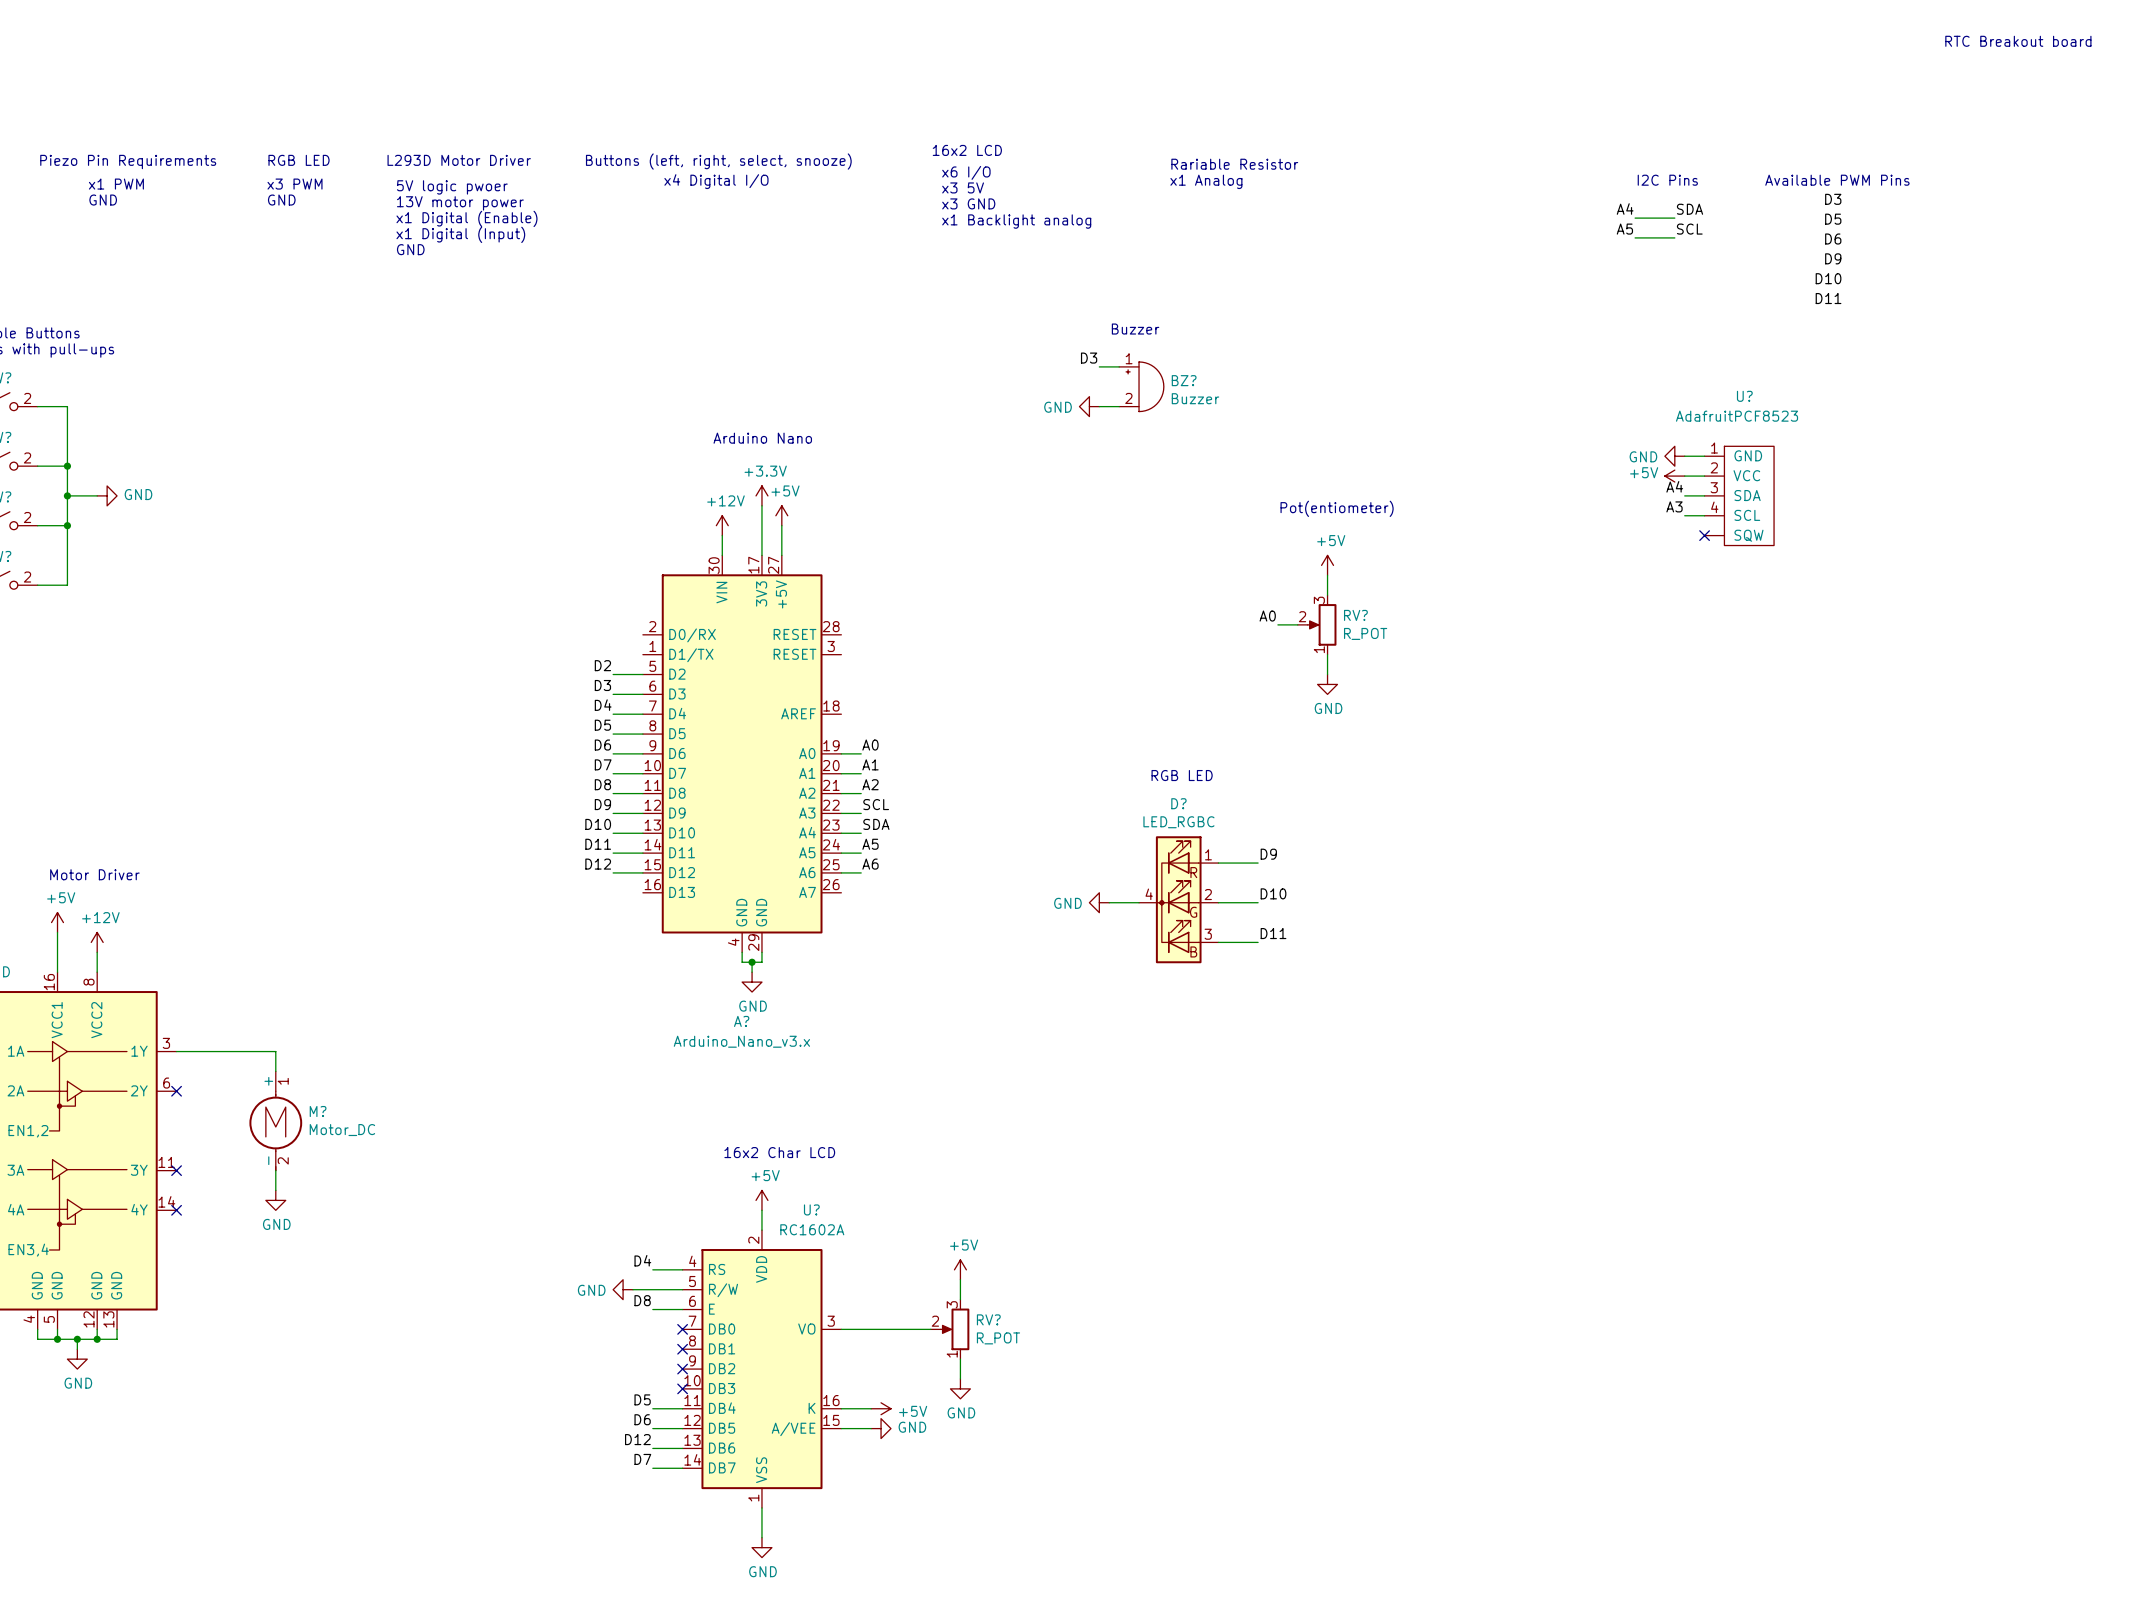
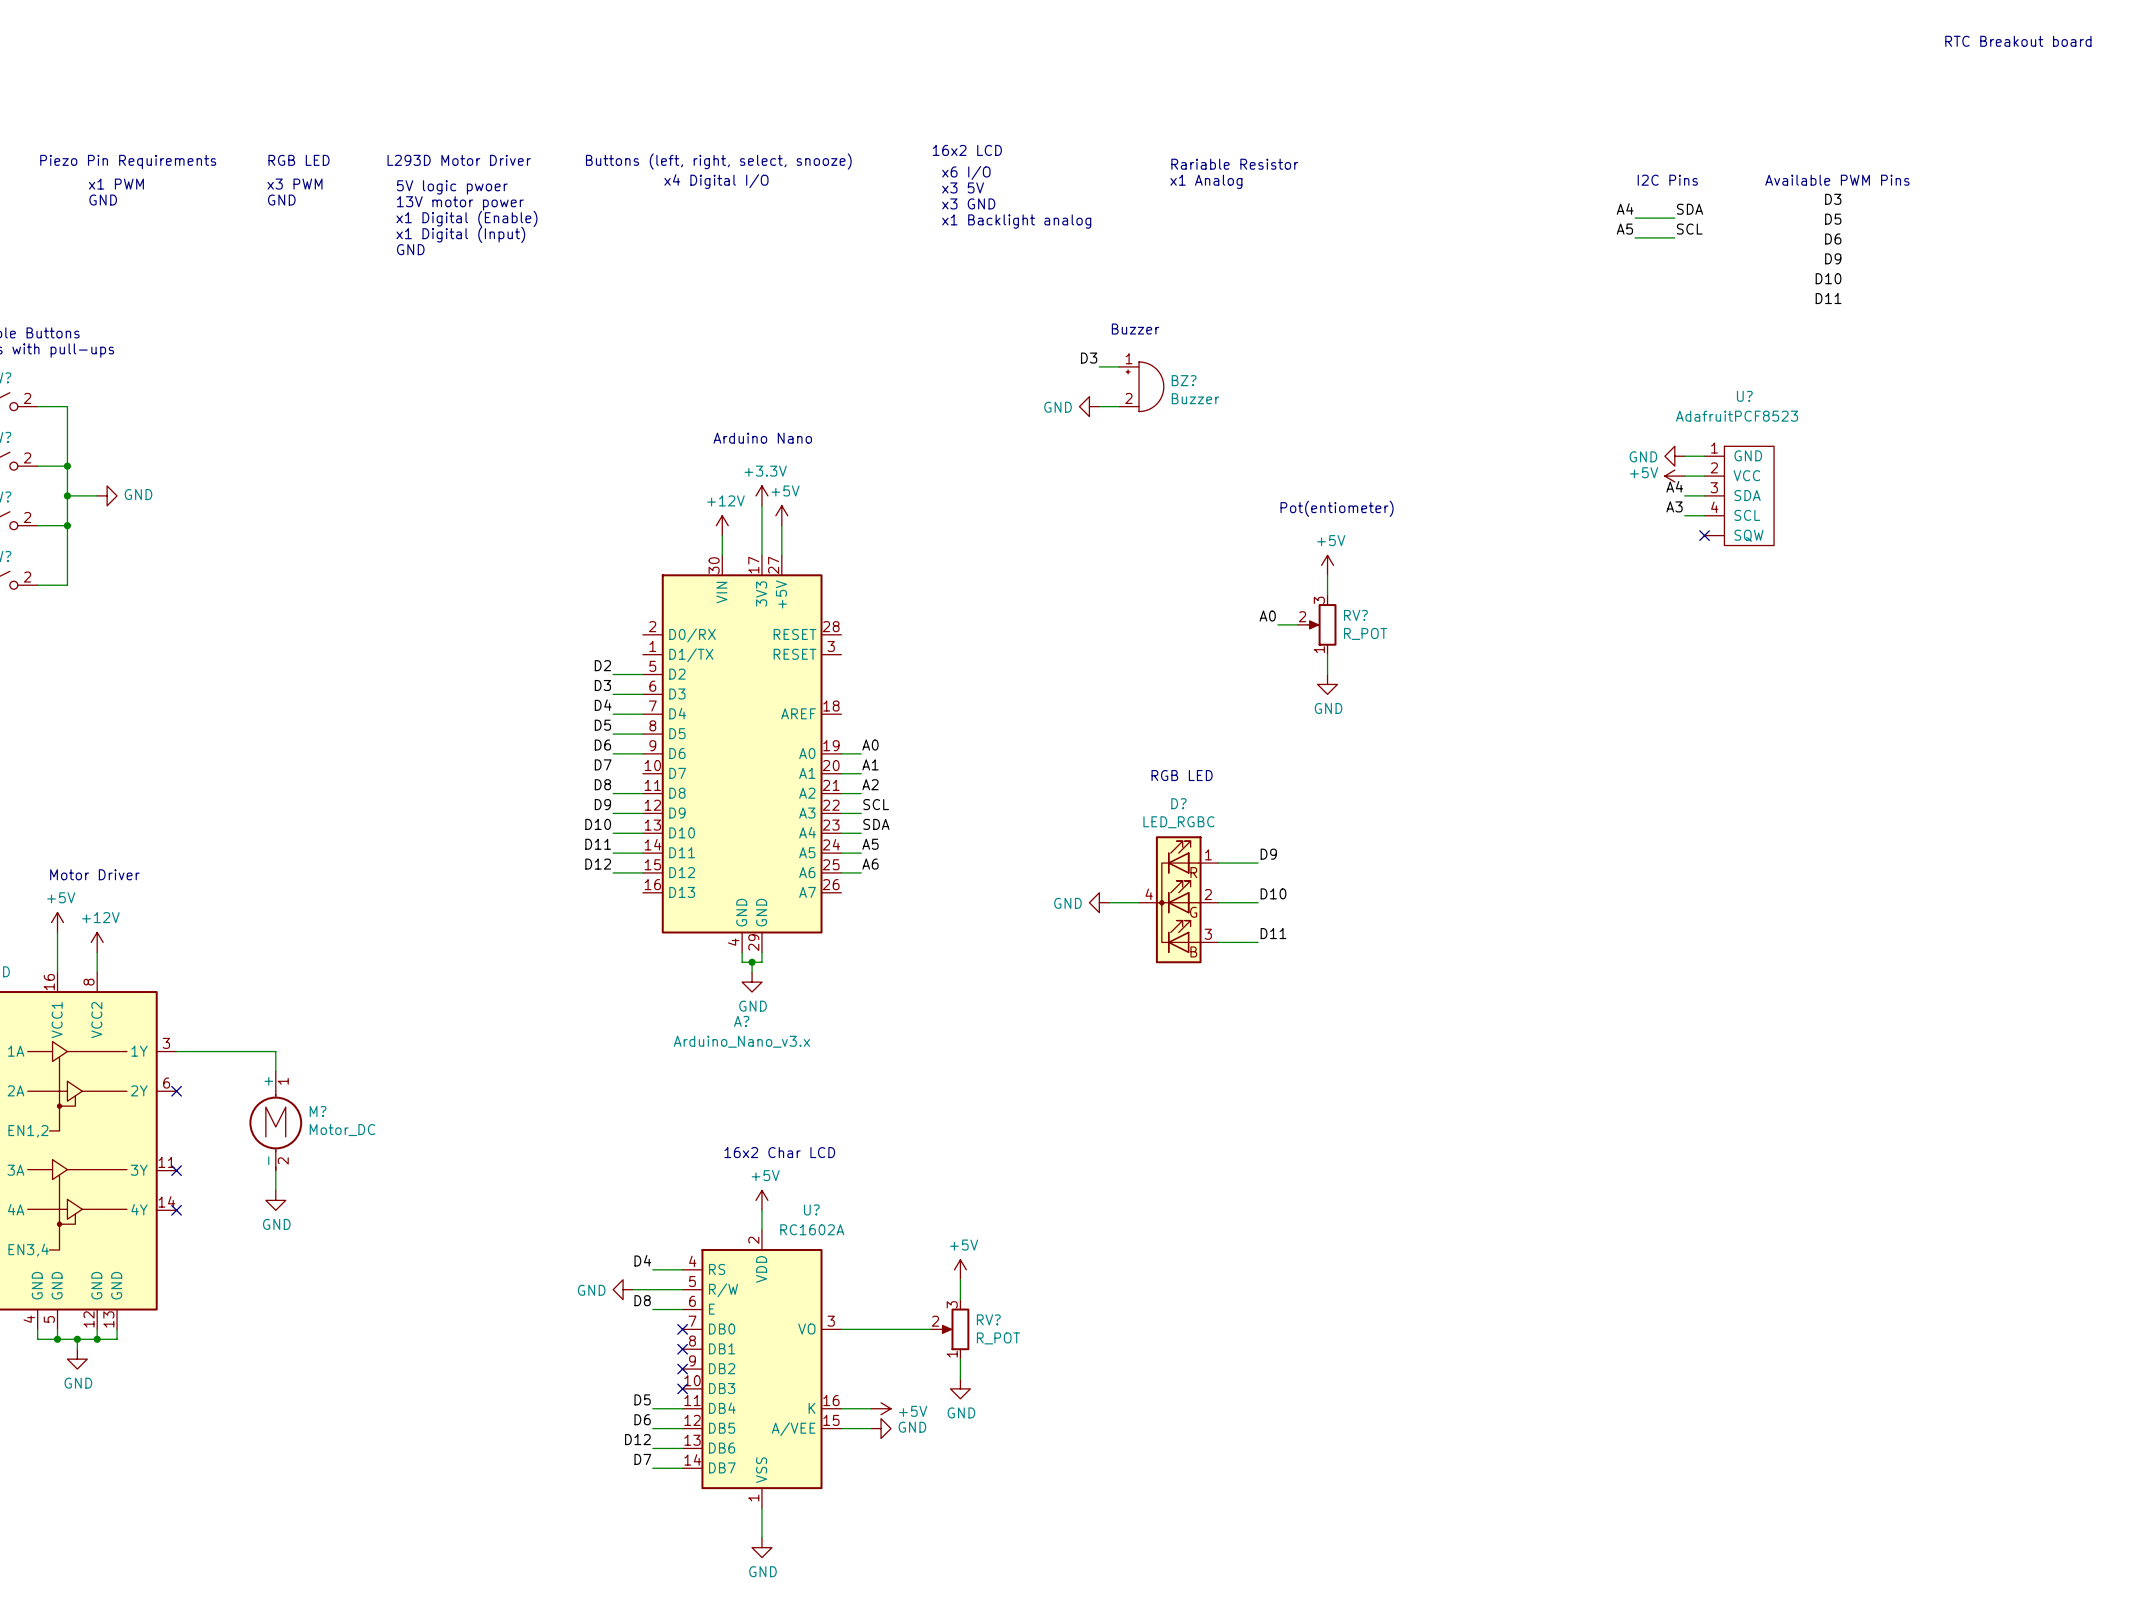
wire: (613, 773) (642, 773) -> none

